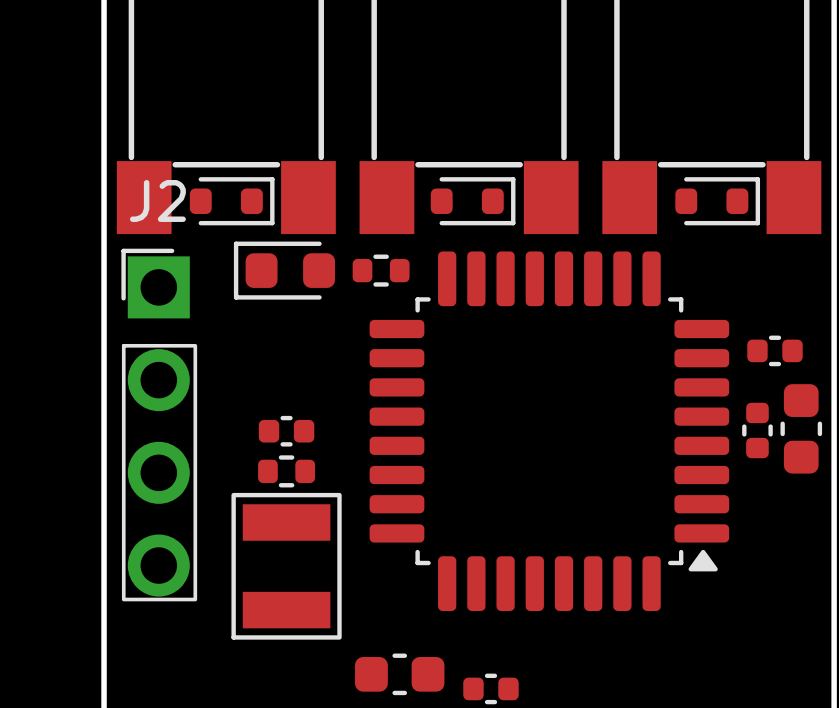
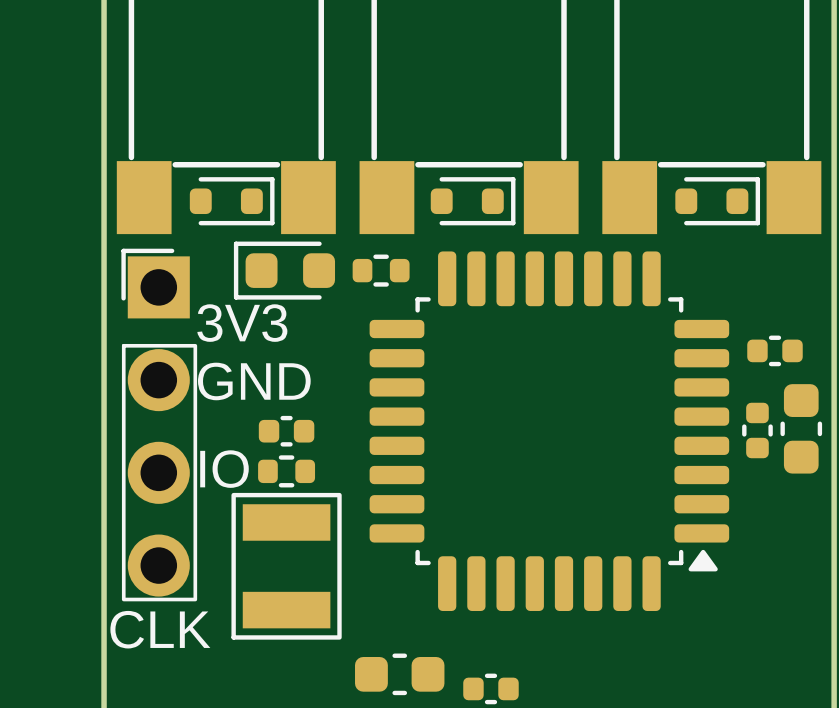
J2 name: J2 (157, 200) -> none
text: none -> 3V3 (242, 323)
text: none -> GND (254, 381)
text: none -> IO (224, 469)
text: none -> CLK (160, 629)

